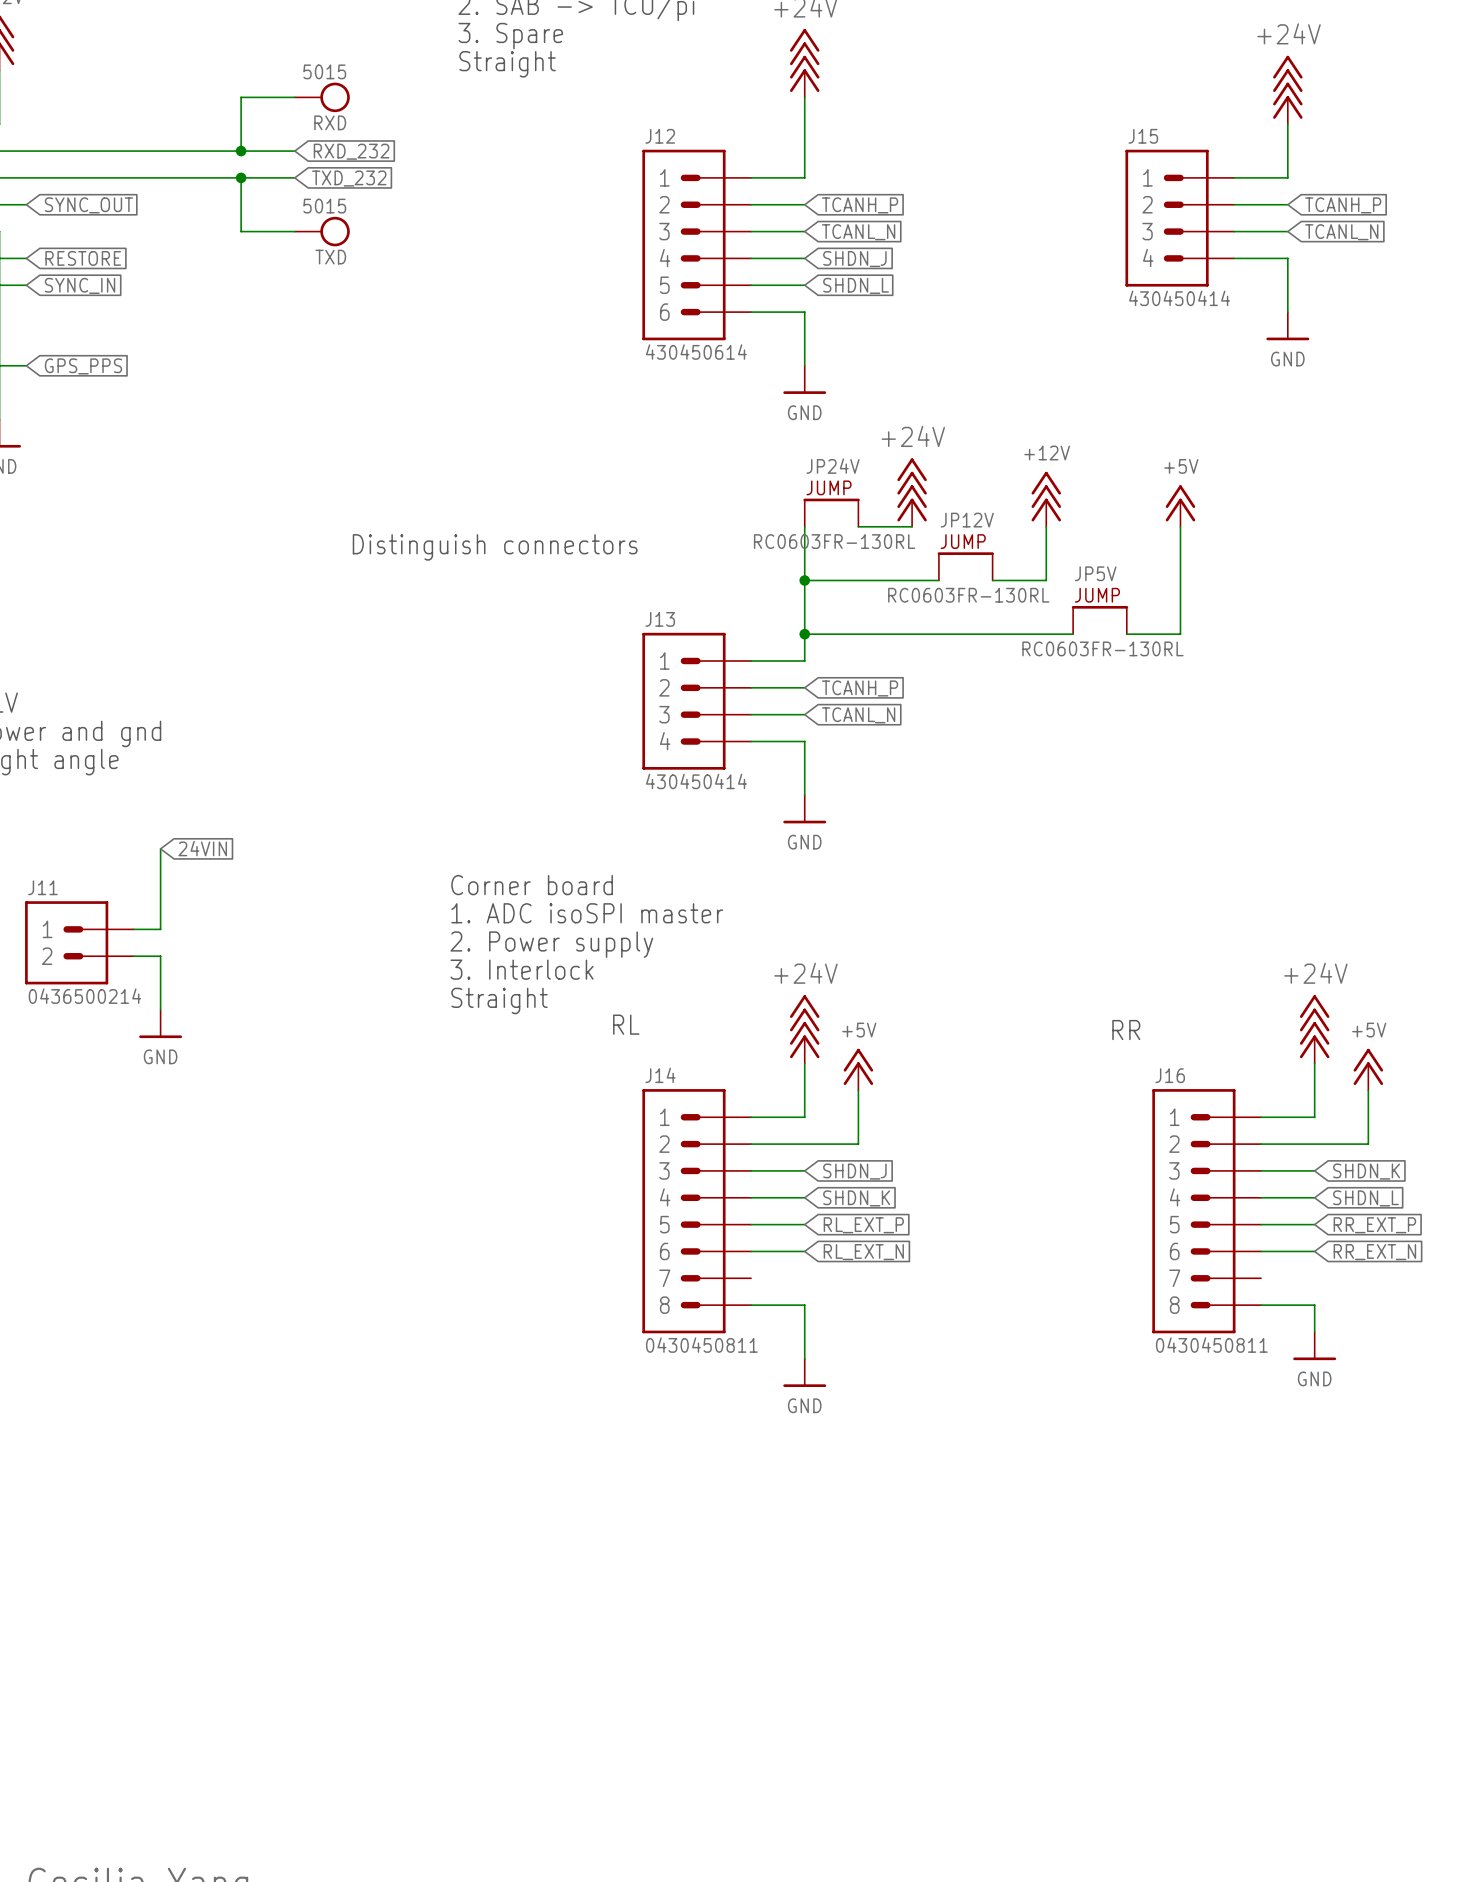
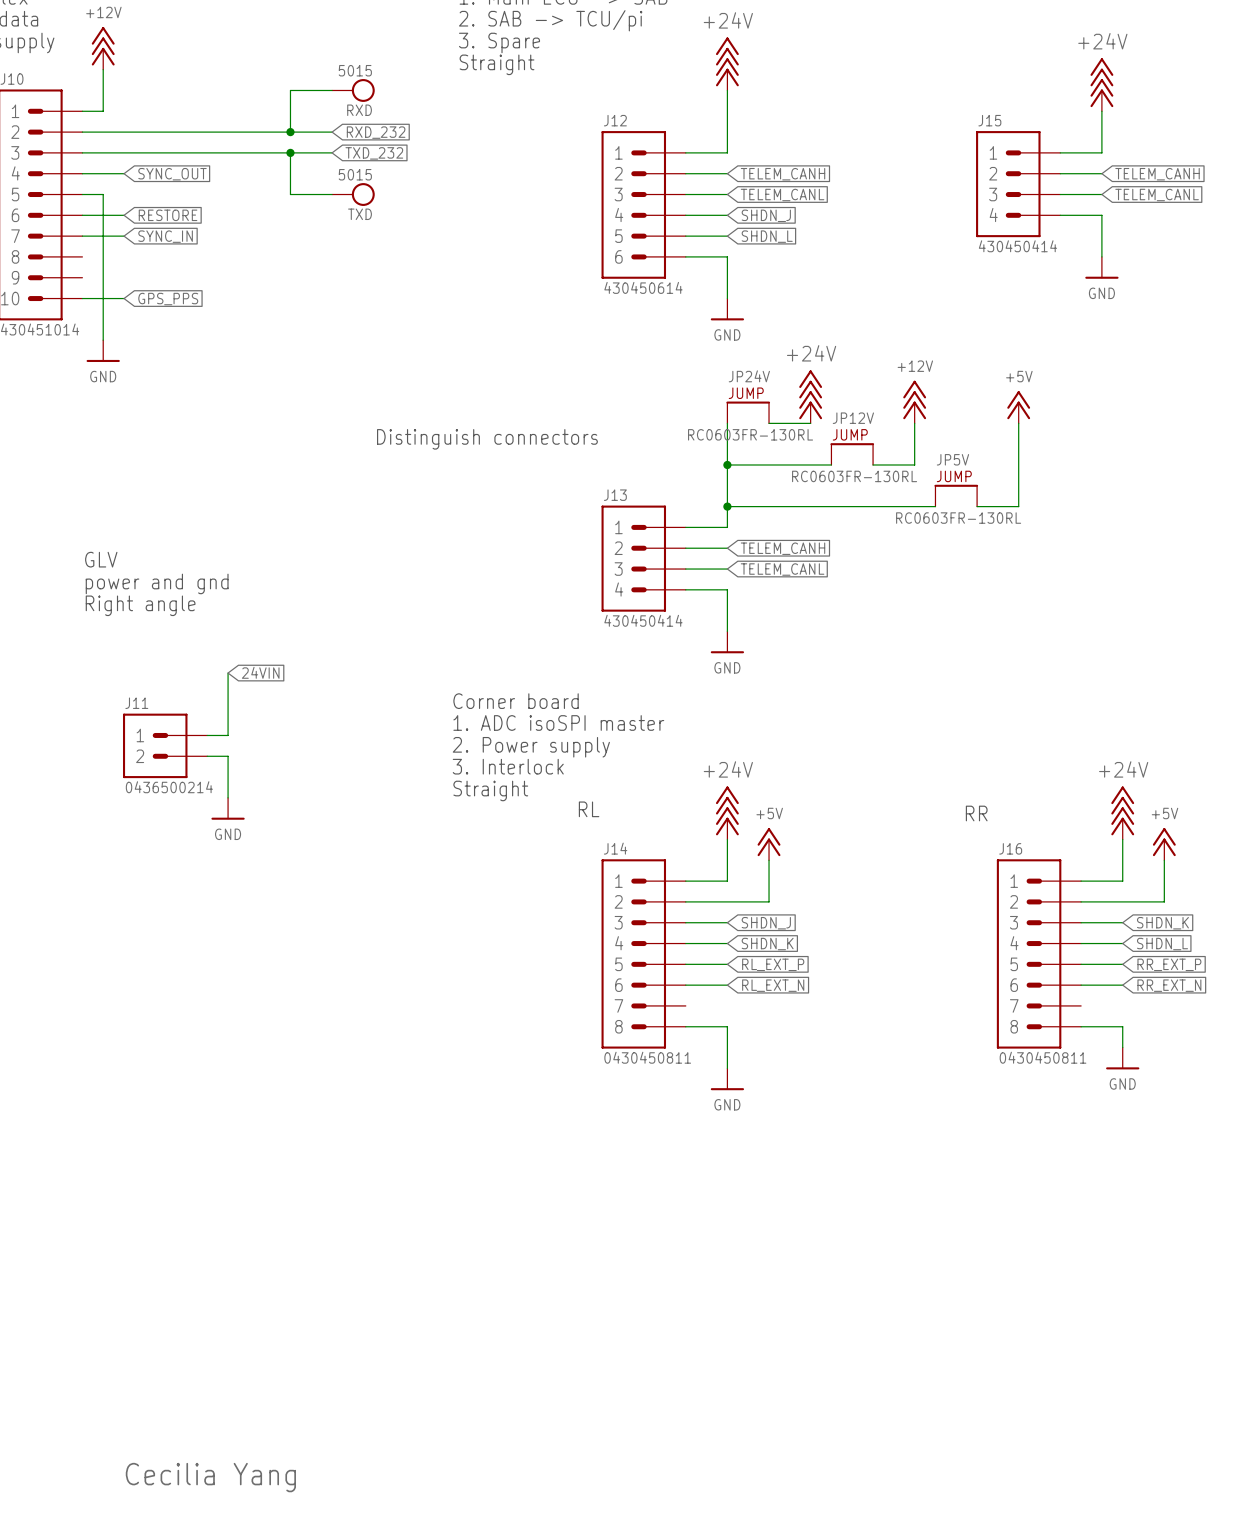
global label: TCANH_P (860, 205) -> TELEM_CANH (783, 174)
global label: TCANH_P (1343, 205) -> TELEM_CANH (1157, 174)
global label: TCANL_N (858, 232) -> TELEM_CANL (782, 195)
global label: TCANL_N (1341, 232) -> TELEM_CANL (1157, 195)
global label: TCANH_P (860, 688) -> TELEM_CANH (783, 548)
global label: TCANL_N (858, 715) -> TELEM_CANL (782, 569)

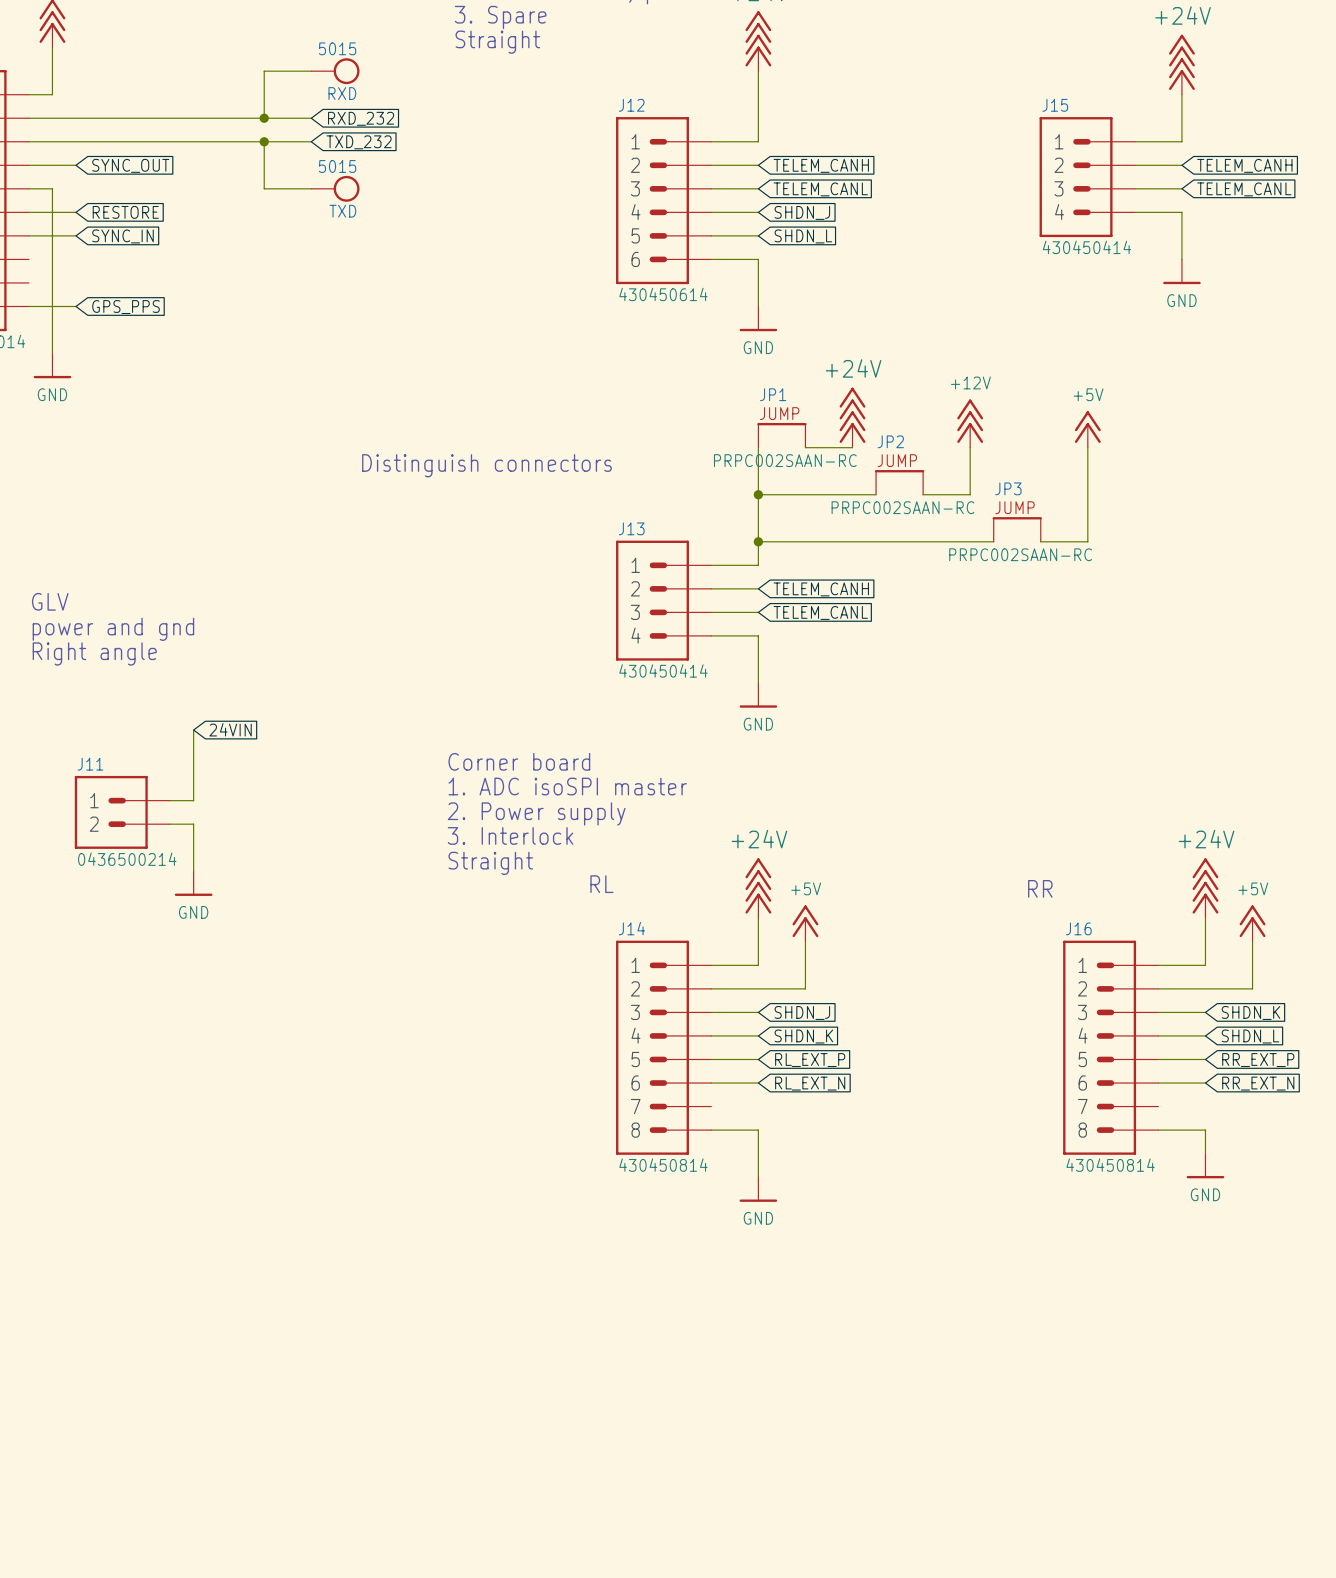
JP24V name: JP24V (749, 376) -> JP1 (773, 394)
JP12V name: JP12V (853, 418) -> JP2 (890, 441)
JP24V text: RC0603FR-130RL (750, 434) -> PRPC002SAAN-RC (785, 460)
JP5V name: JP5V (952, 459) -> JP3 (1008, 488)
JP12V text: RC0603FR-130RL (854, 476) -> PRPC002SAAN-RC (902, 507)
JP5V text: RC0603FR-130RL (958, 518) -> PRPC002SAAN-RC (1020, 554)
J14 text: 0430450811 (647, 1057) -> 430450814 (663, 1165)
J16 text: 0430450811 (1043, 1057) -> 430450814 (1110, 1165)

